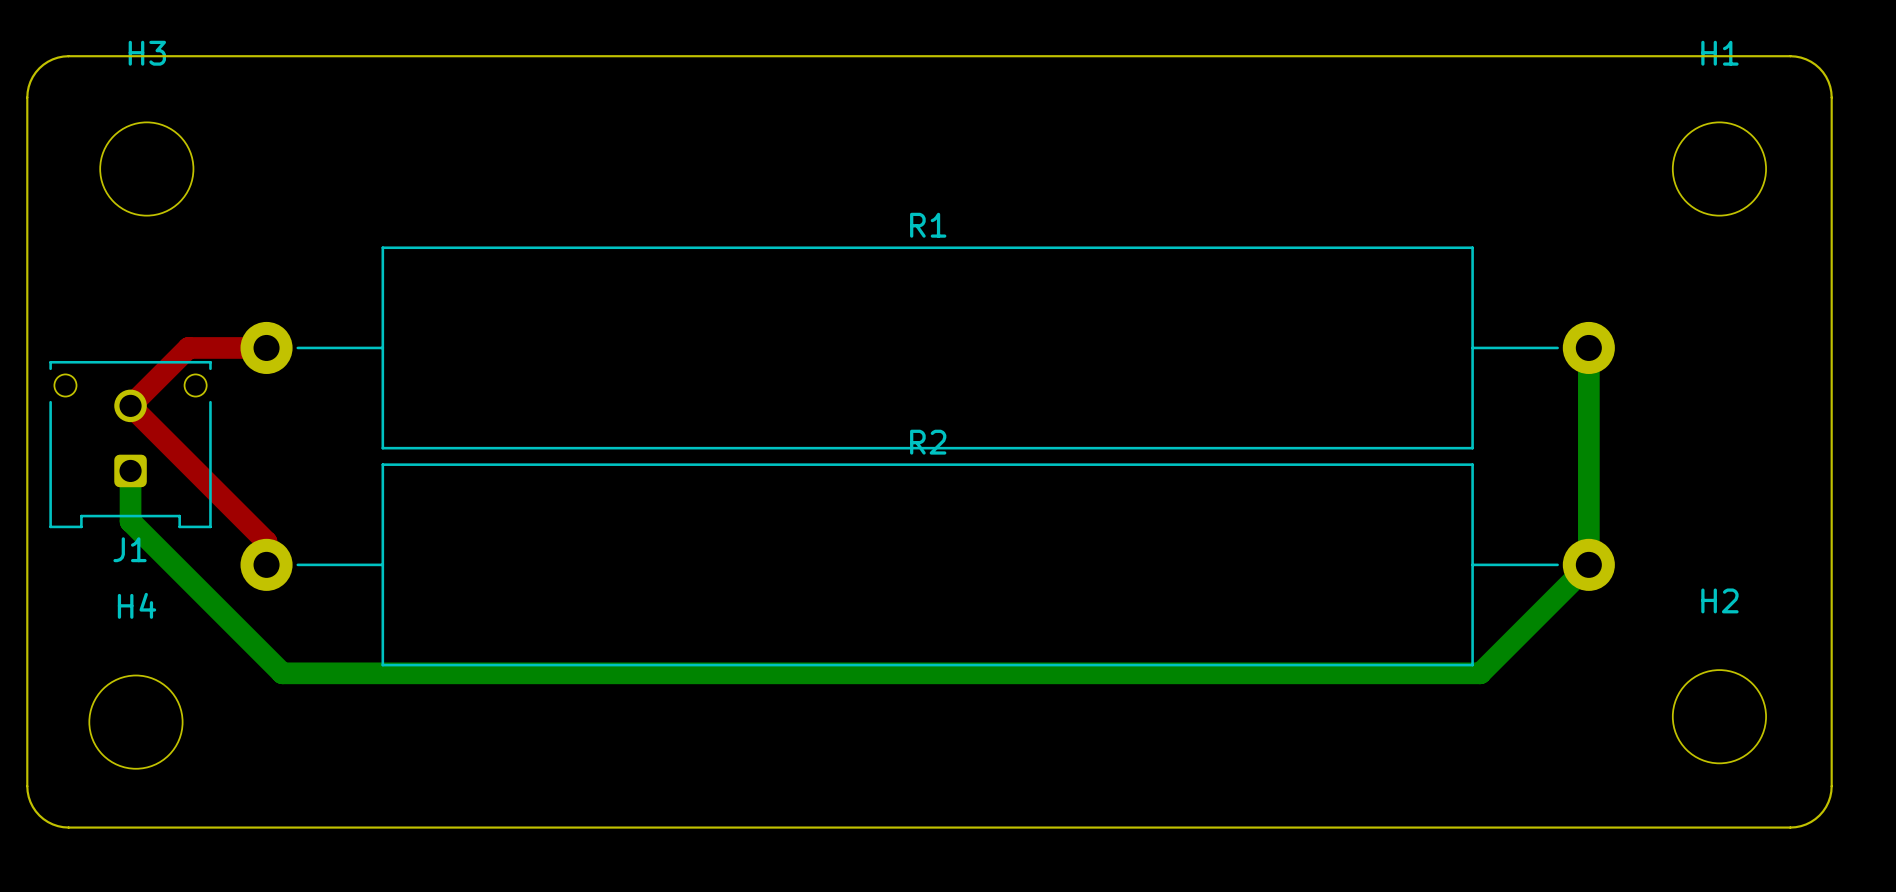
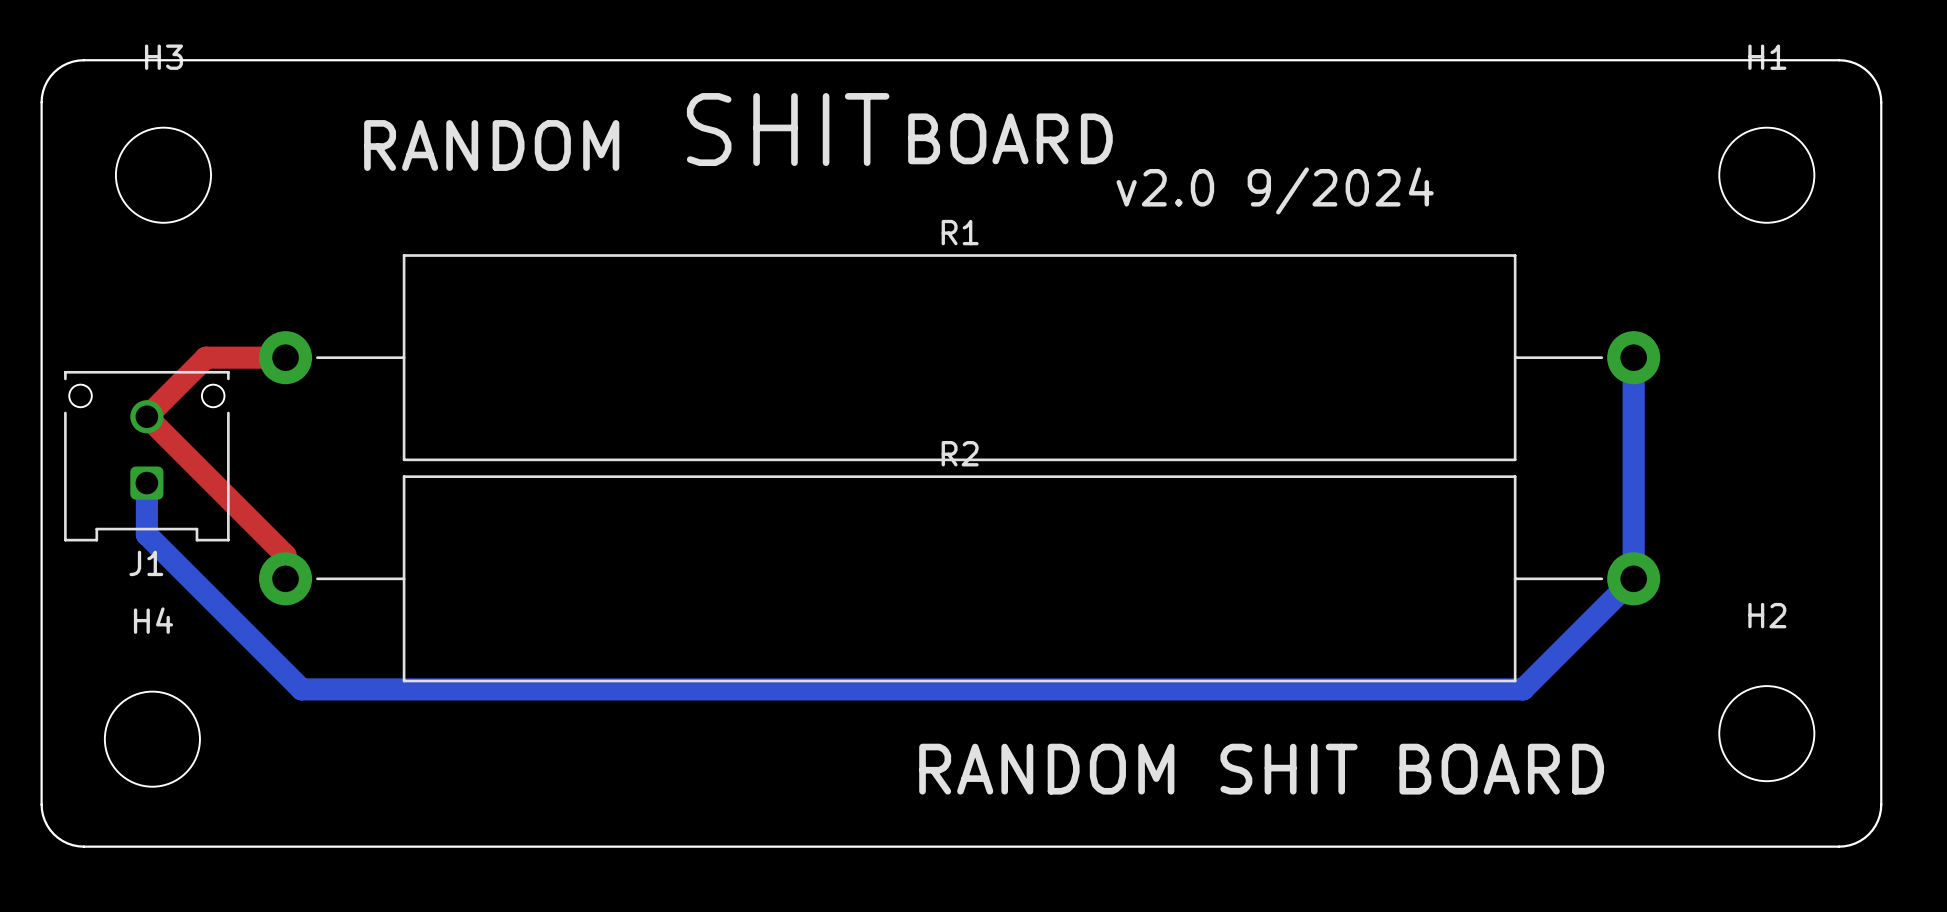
text: none -> SHIT (788, 129)
text: none -> BOARD (1010, 138)
text: none -> RANDOM (491, 145)
text: none -> v2.0 9/2024 (1275, 190)
text: none -> RANDOM SHIT BOARD (1261, 769)

